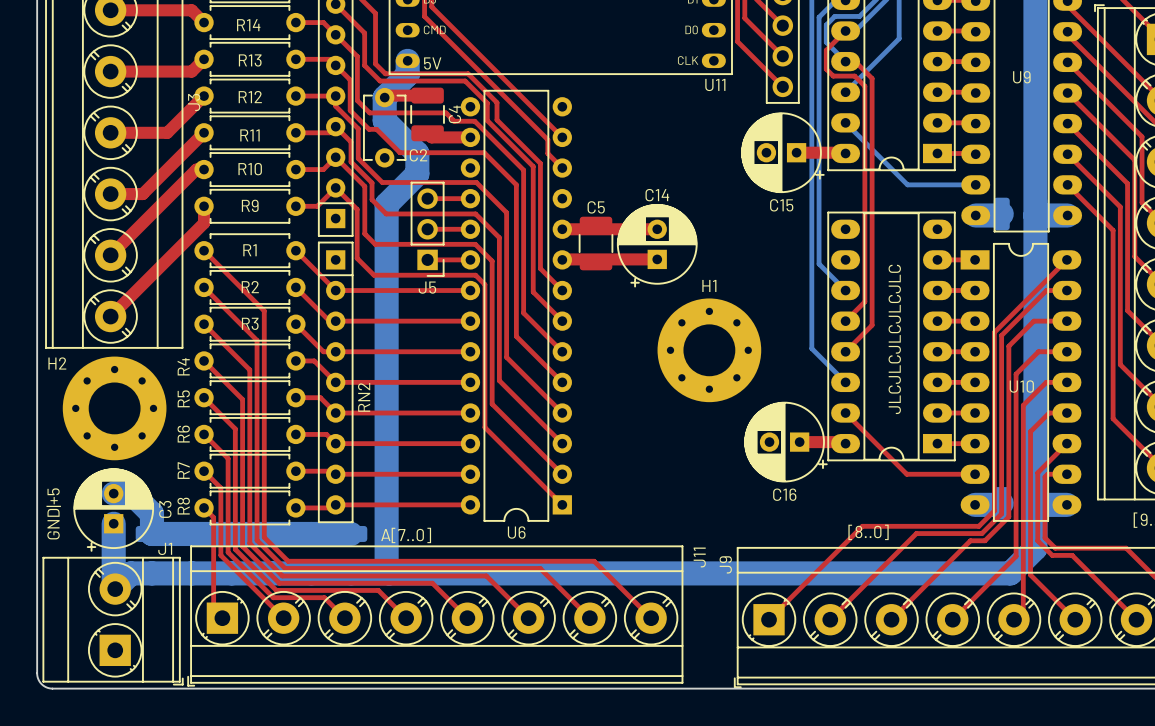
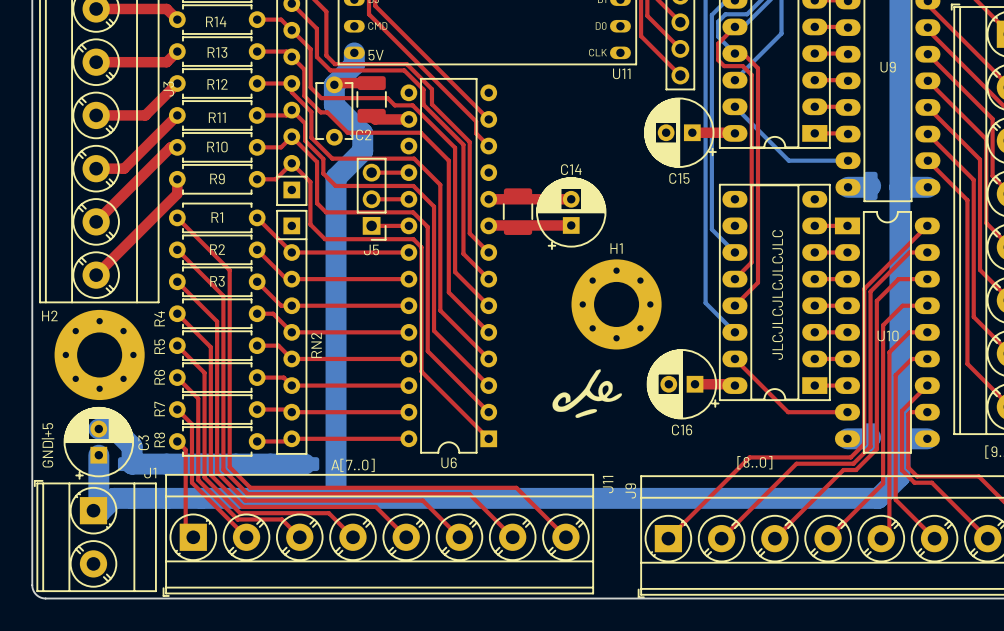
C4 name: C4 (454, 114) -> none
C5 name: C5 (596, 207) -> none
drawing: none -> [552, 369, 622, 418]
J1 rotation: 0° (113, 621) -> 180° (95, 536)

